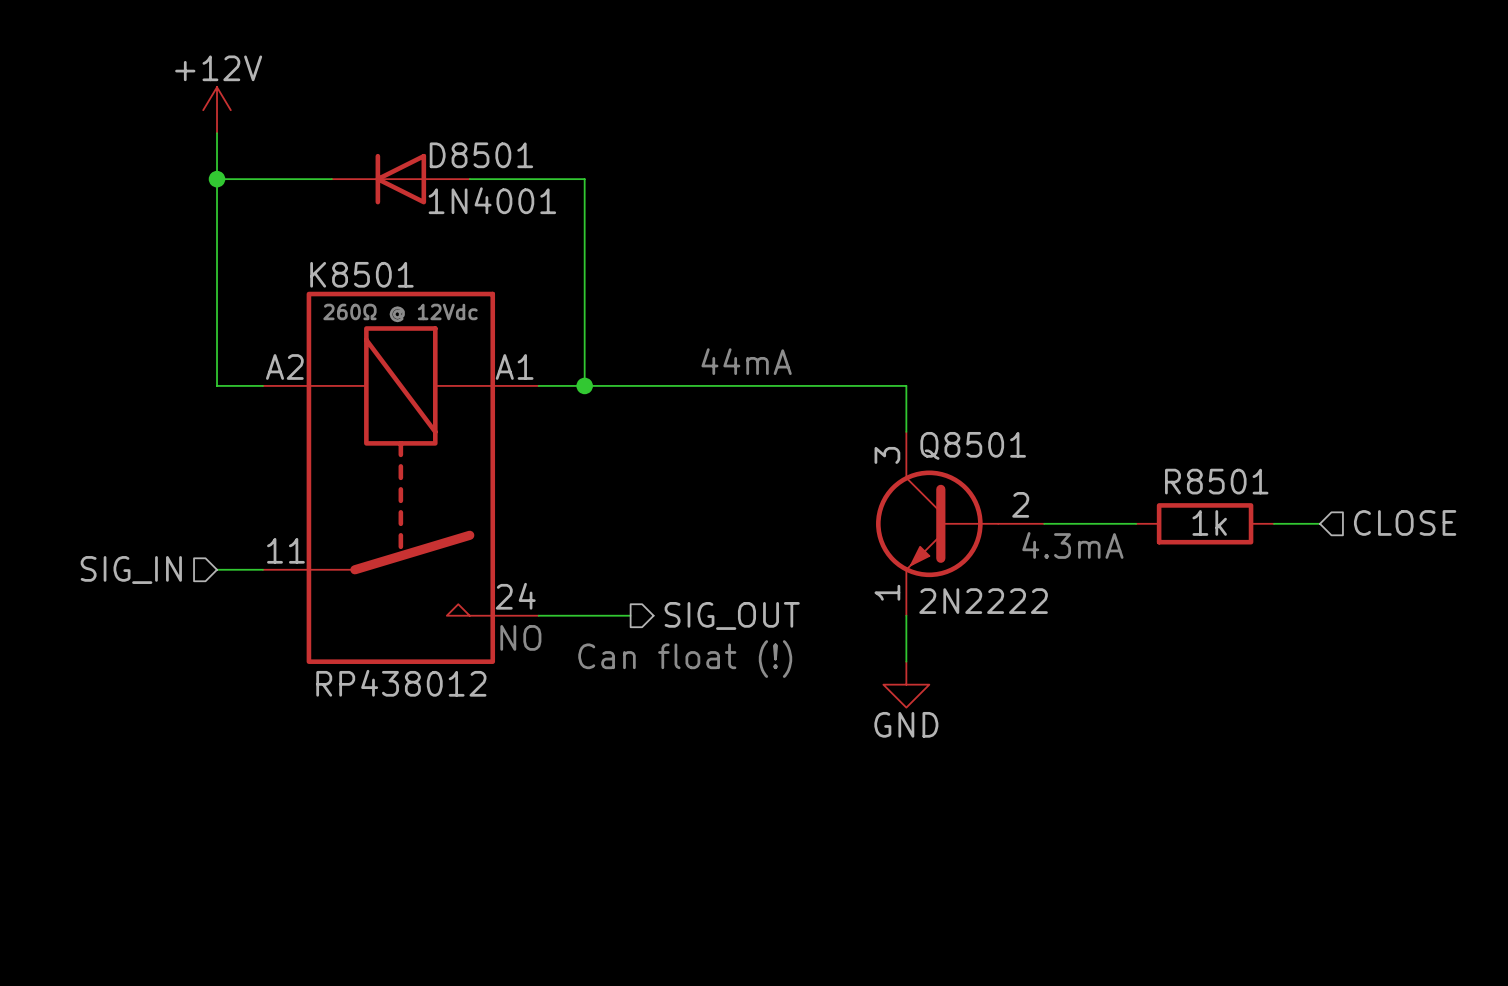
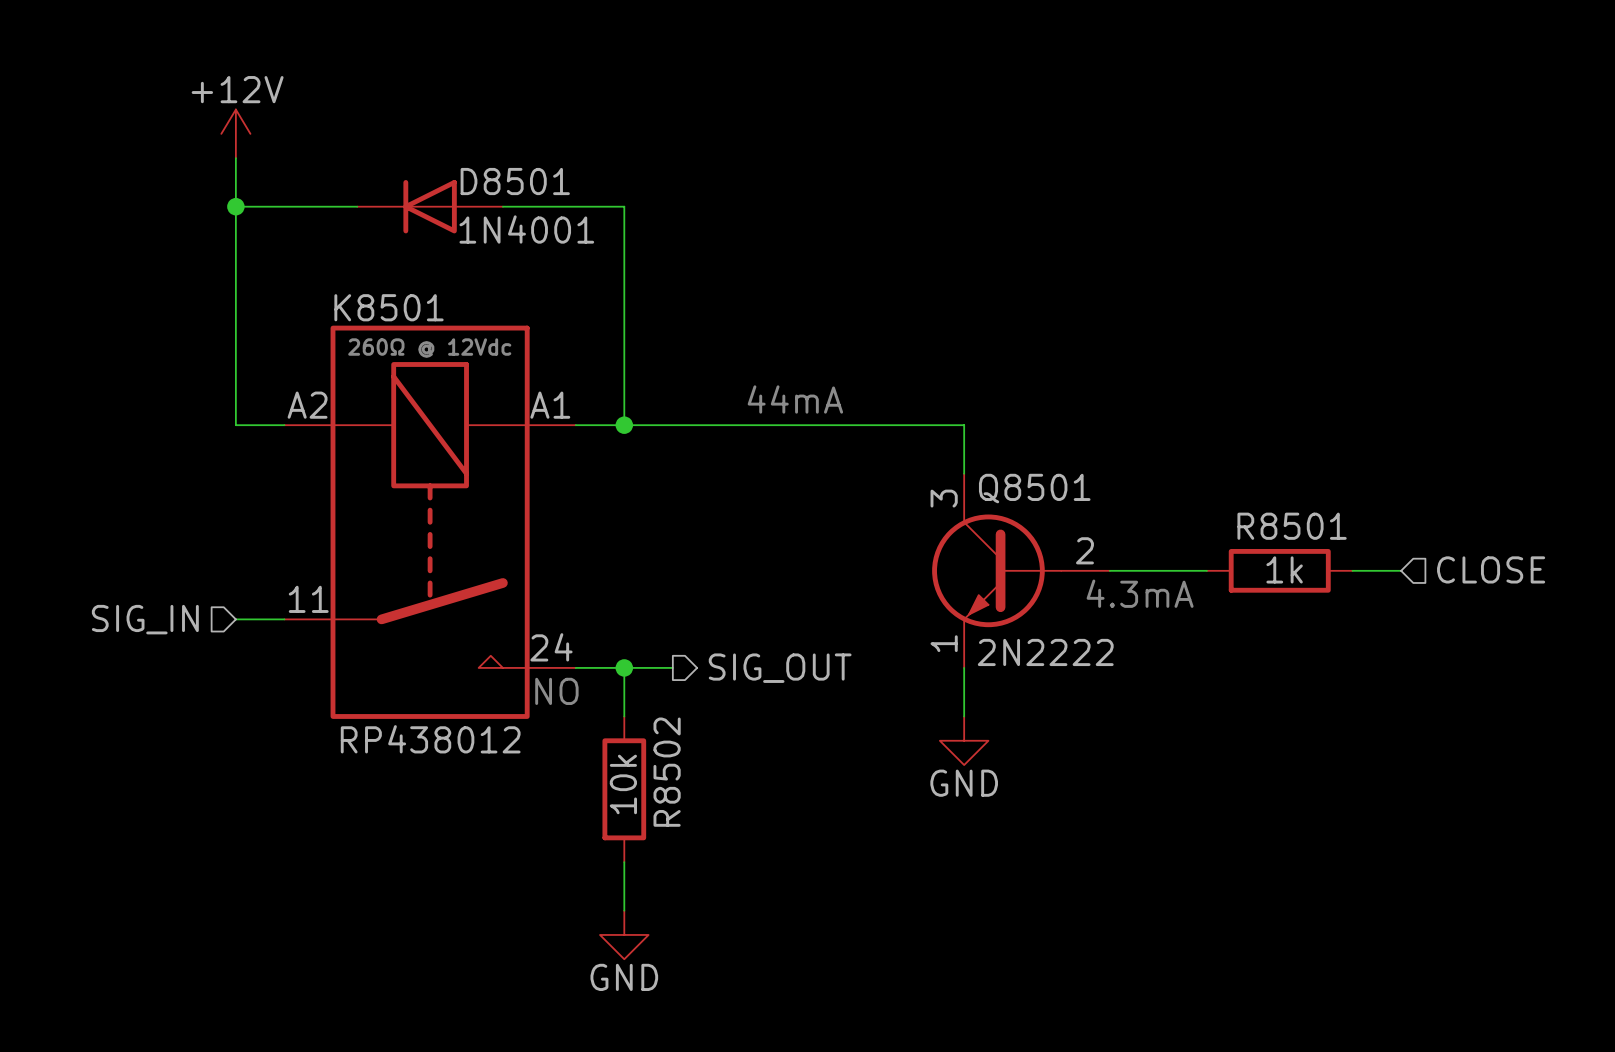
wire: none -> (624, 667) (624, 716)
junction: none -> (624, 667)
text: Can float (!) (685, 659) -> none
R8502: none -> 10k (624, 789)
wire: none -> (624, 862) (624, 910)
power symbol: none -> GND (624, 934)

